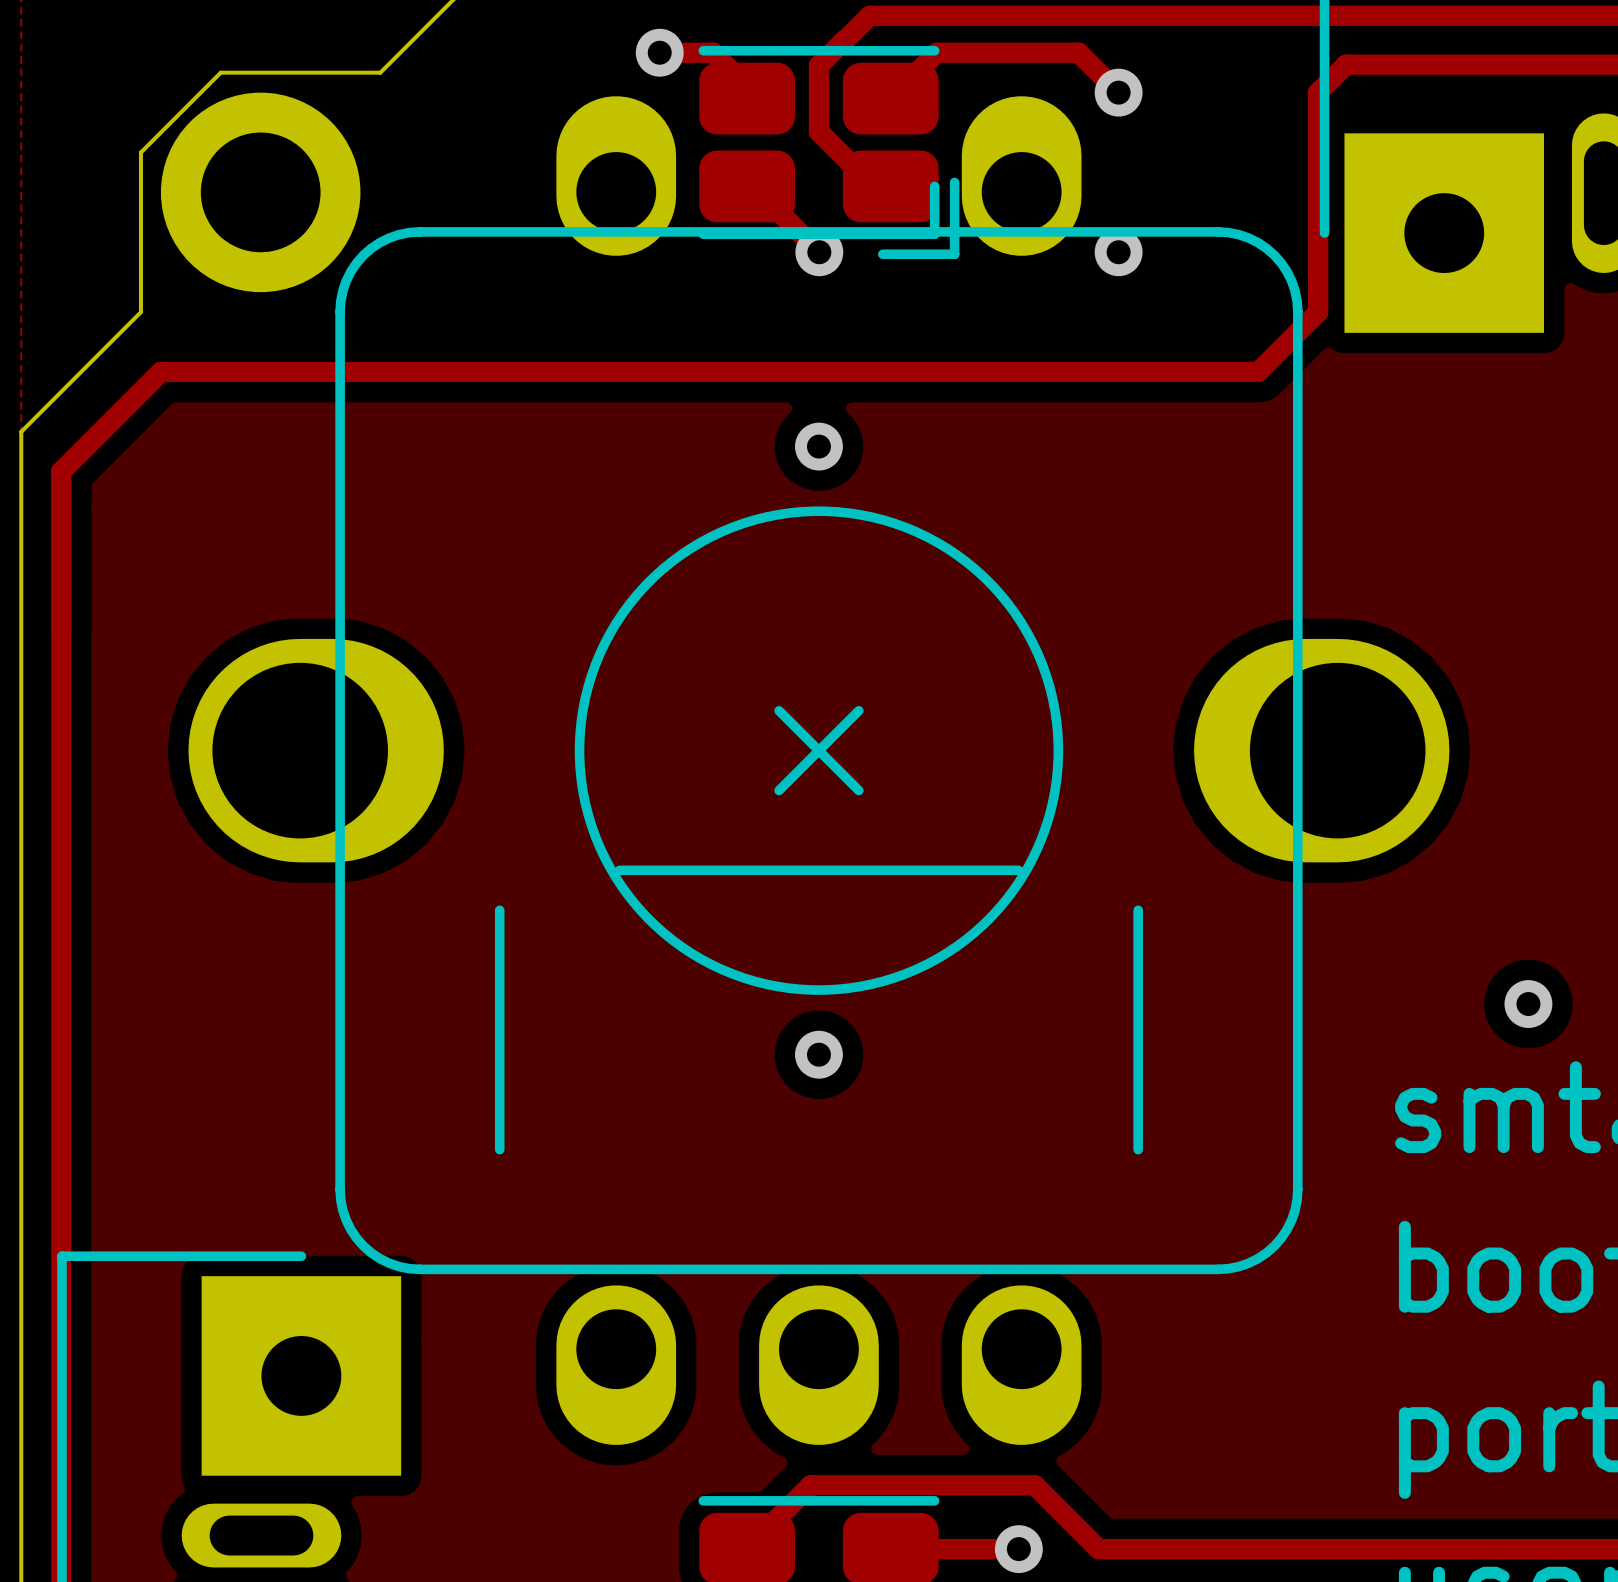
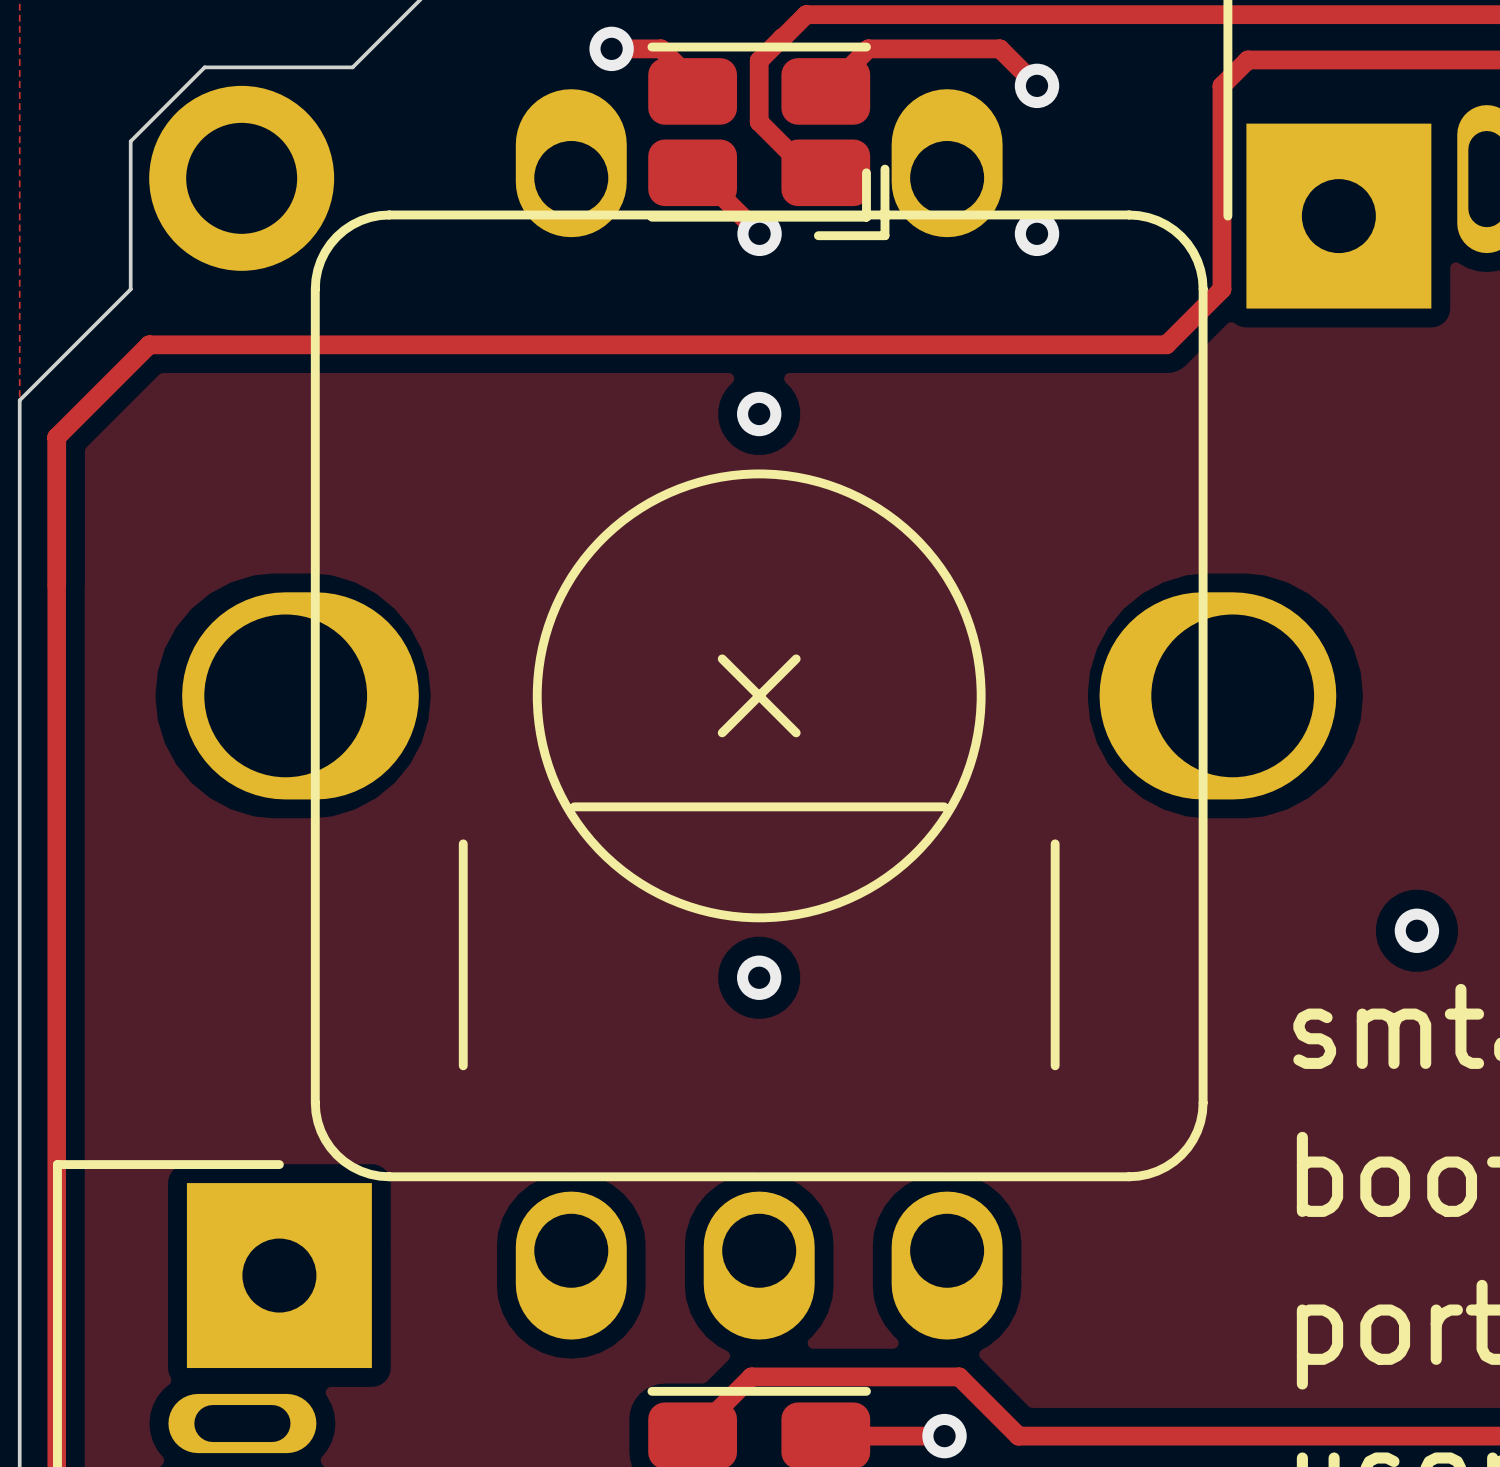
part footprint: [188, 96, 1450, 1445] -> [182, 89, 1337, 1340]

